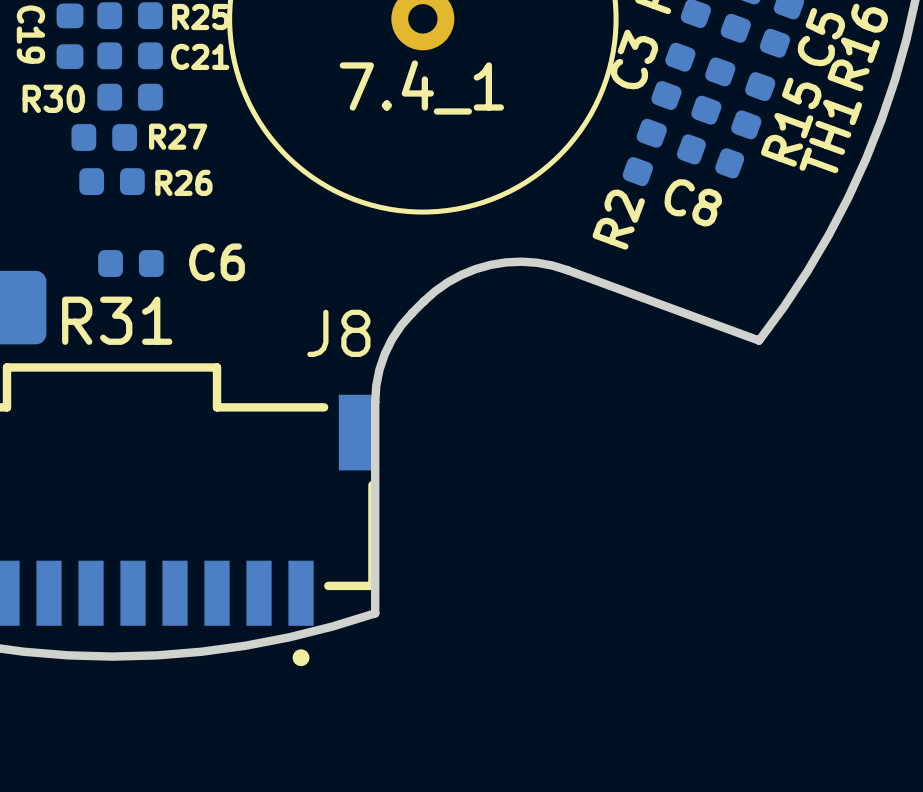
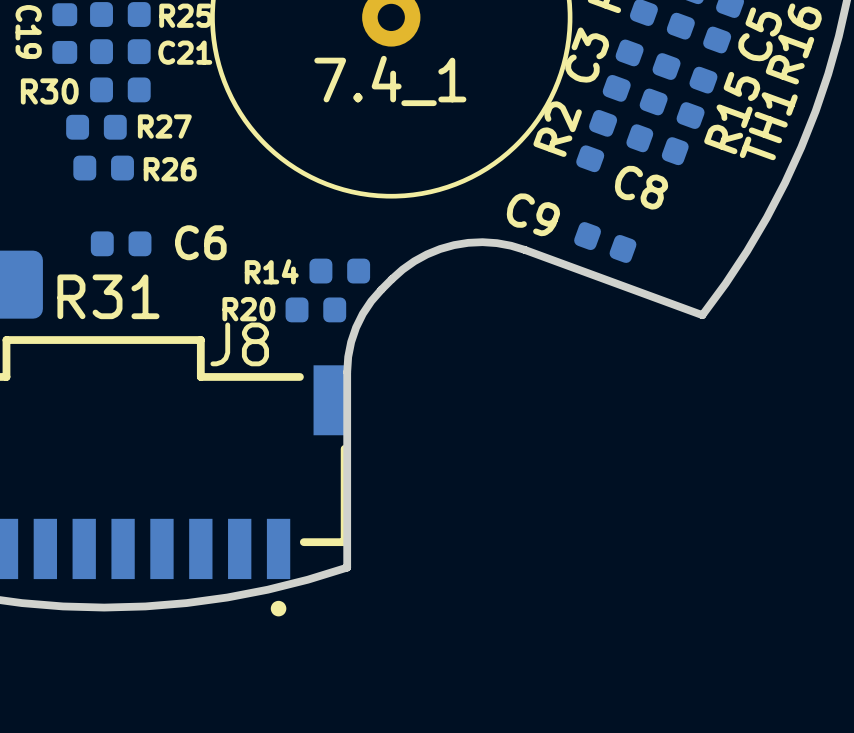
R2 name position: R2 (618, 219) -> R2 (557, 129)
C9: none -> (605, 242)
R14: none -> (339, 271)
J8 name position: J8 (338, 333) -> J8 (239, 344)
R20: none -> (315, 309)

